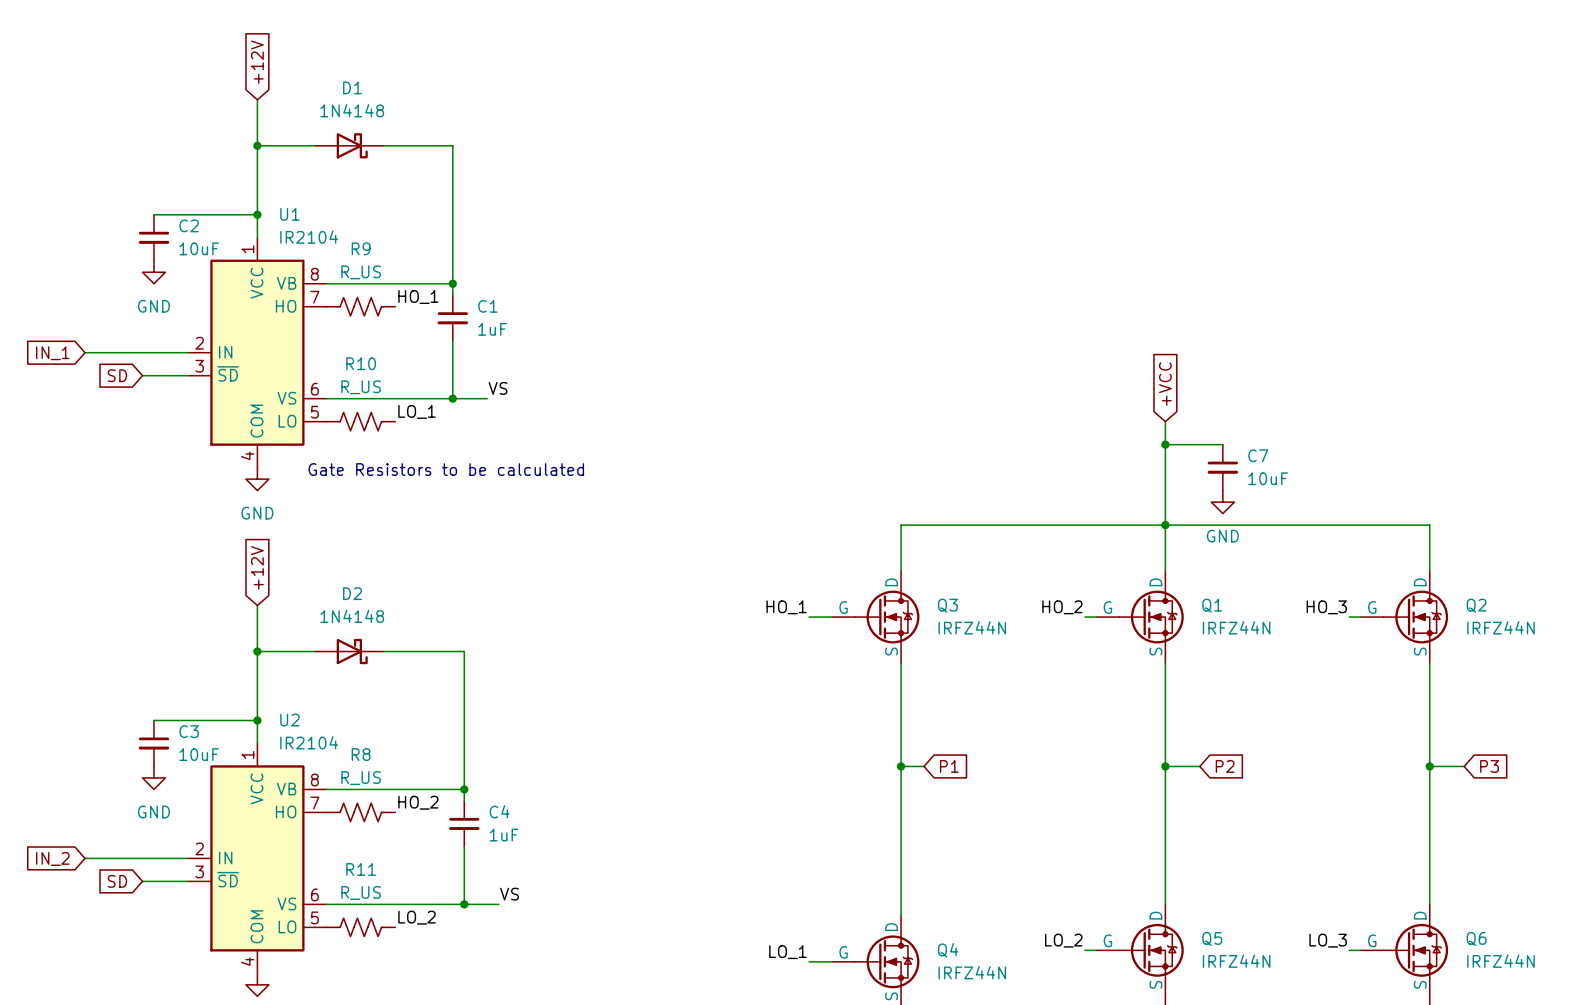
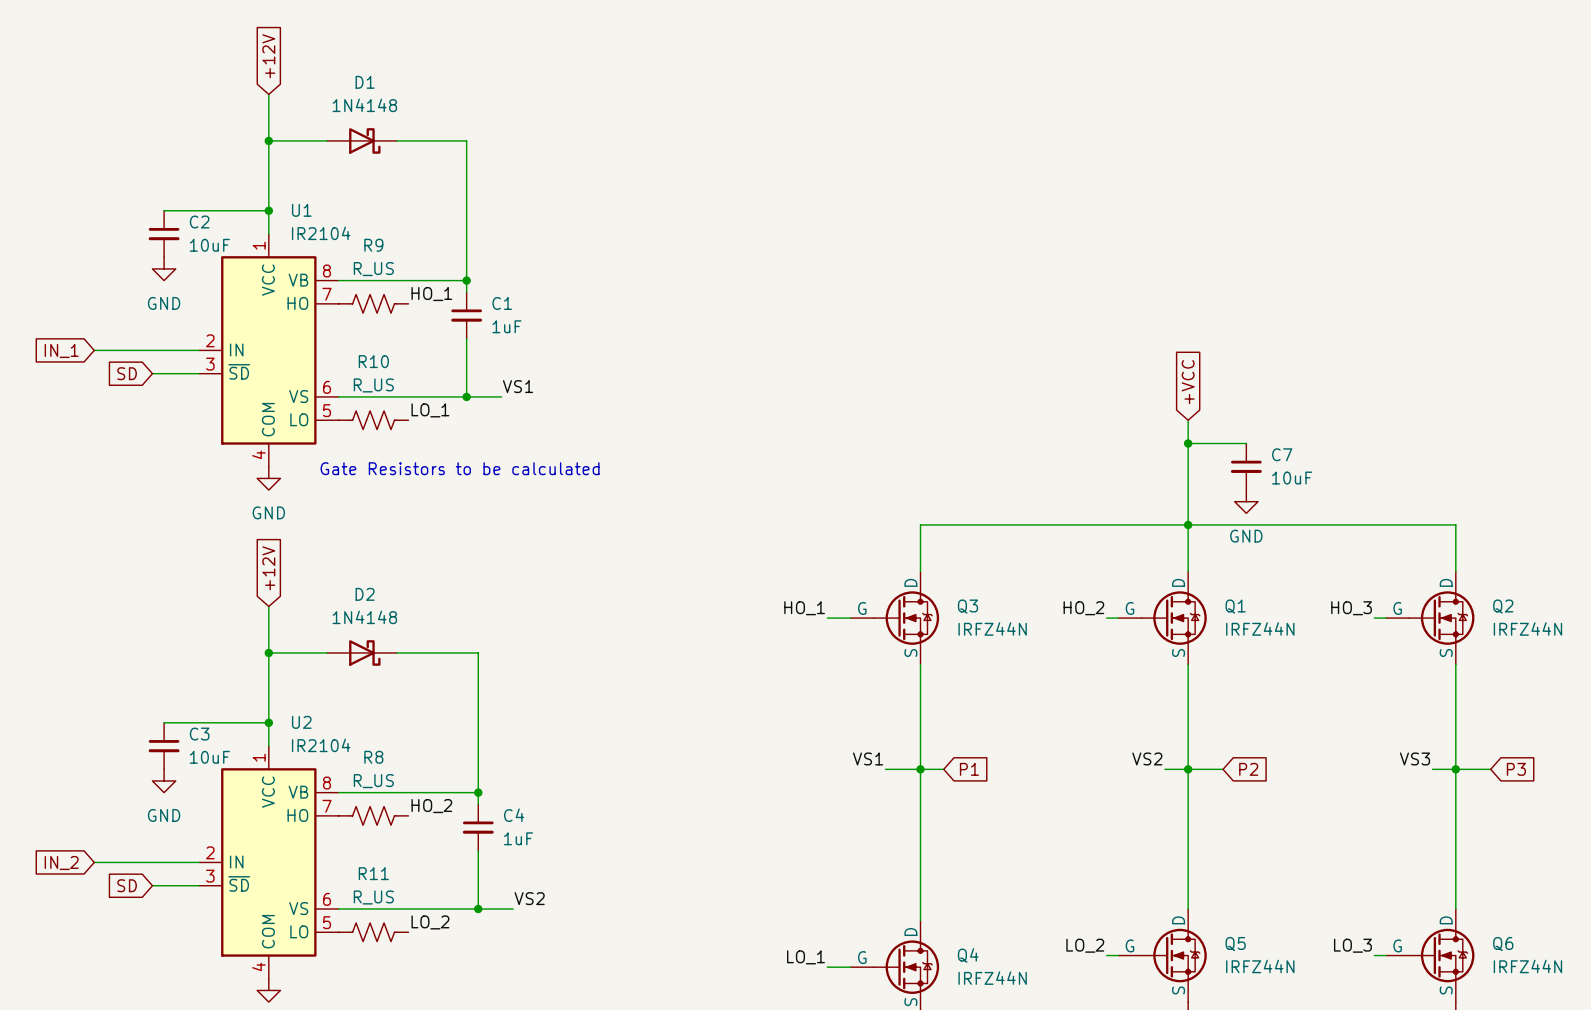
label: VS (498, 388) -> VS1 (517, 386)
label: none -> VS1 (868, 758)
label: none -> VS2 (1147, 758)
label: none -> VS3 (1414, 758)
wire: none -> (885, 769) (920, 769)
wire: none -> (1164, 769) (1188, 769)
wire: none -> (1432, 769) (1455, 769)
label: VS (509, 894) -> VS2 (529, 898)

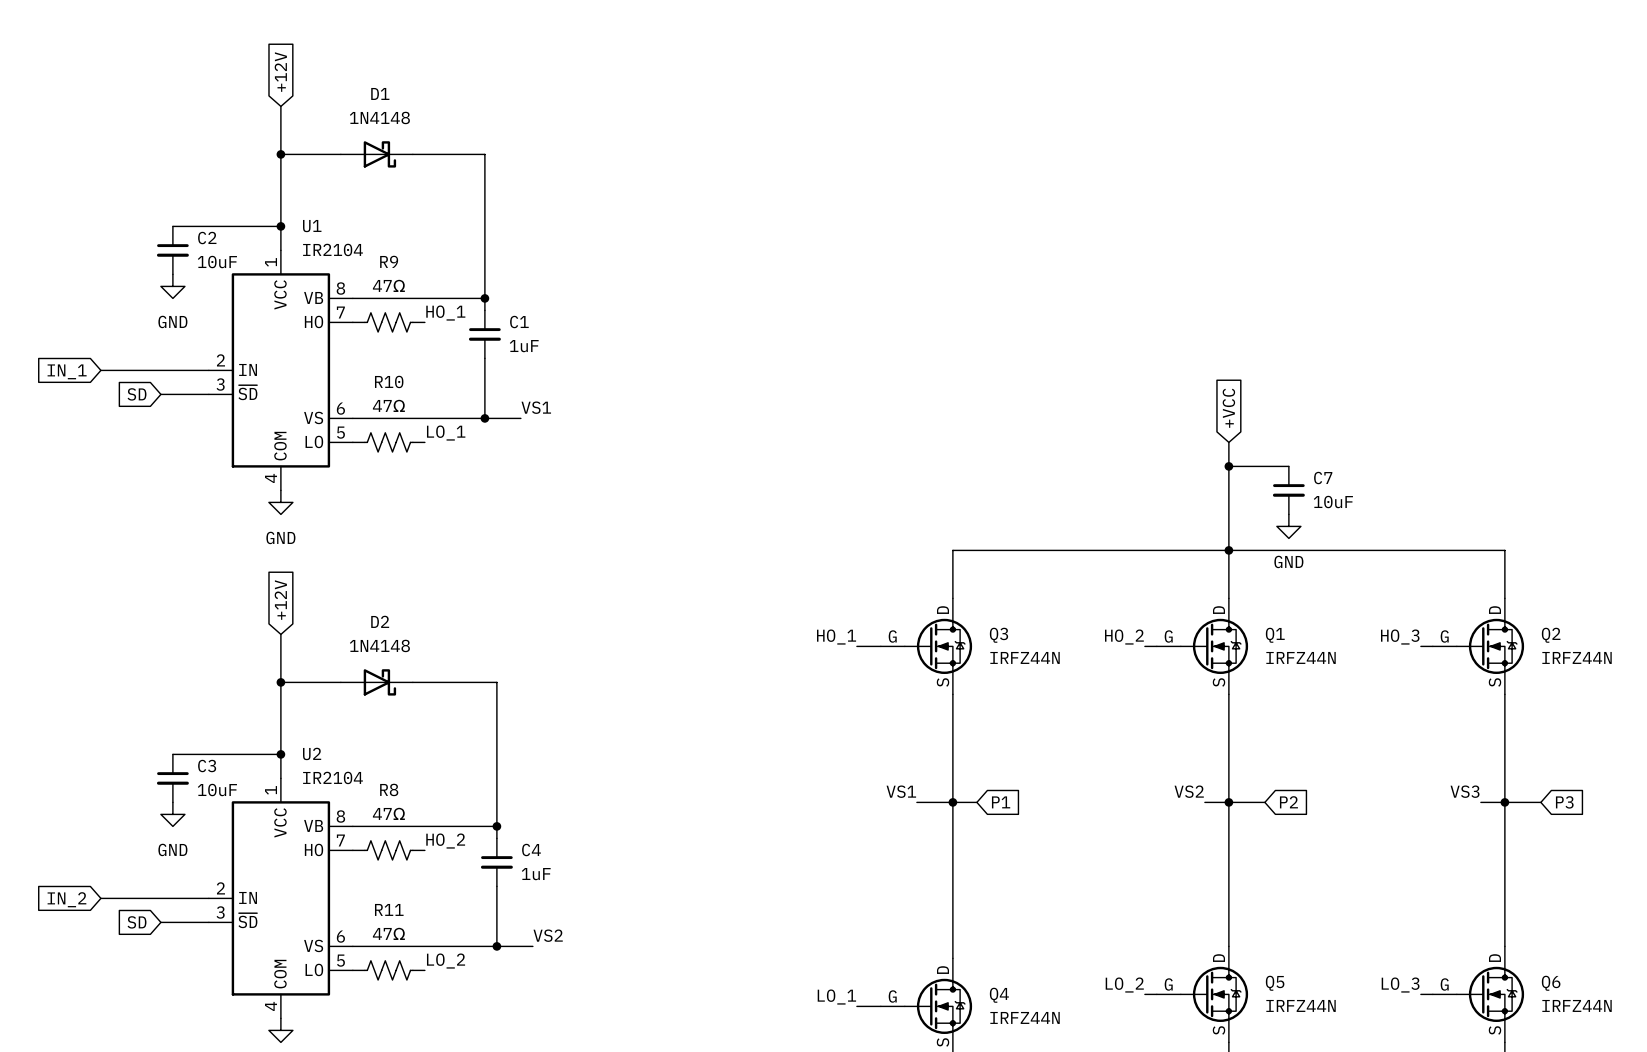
R9 value: R_US (373, 269) -> 47Ω (388, 285)
R10 value: R_US (373, 385) -> 47Ω (388, 405)
text: Gate Resistors to be calculated (460, 468) -> none
R8 value: R_US (373, 781) -> 47Ω (388, 813)
R11 value: R_US (373, 897) -> 47Ω (388, 933)

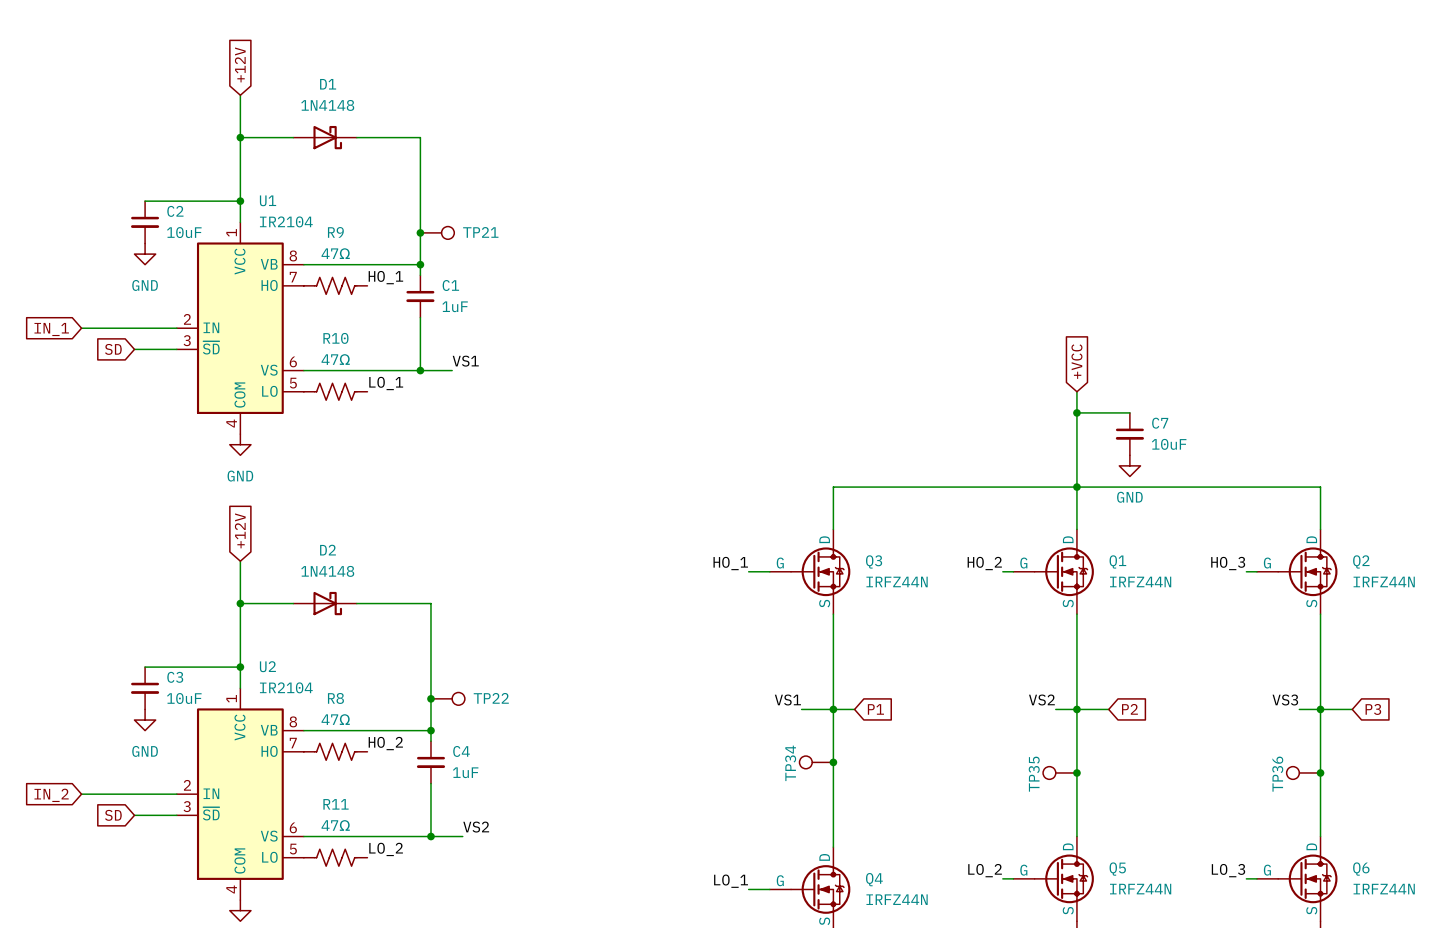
junction: none -> (420, 232)
TP21: none -> (437, 232)
junction: none -> (430, 698)
TP22: none -> (447, 698)
TP34: none -> (816, 762)
junction: none -> (833, 762)
TP35: none -> (1060, 772)
junction: none -> (1076, 772)
TP36: none -> (1303, 772)
junction: none -> (1320, 772)

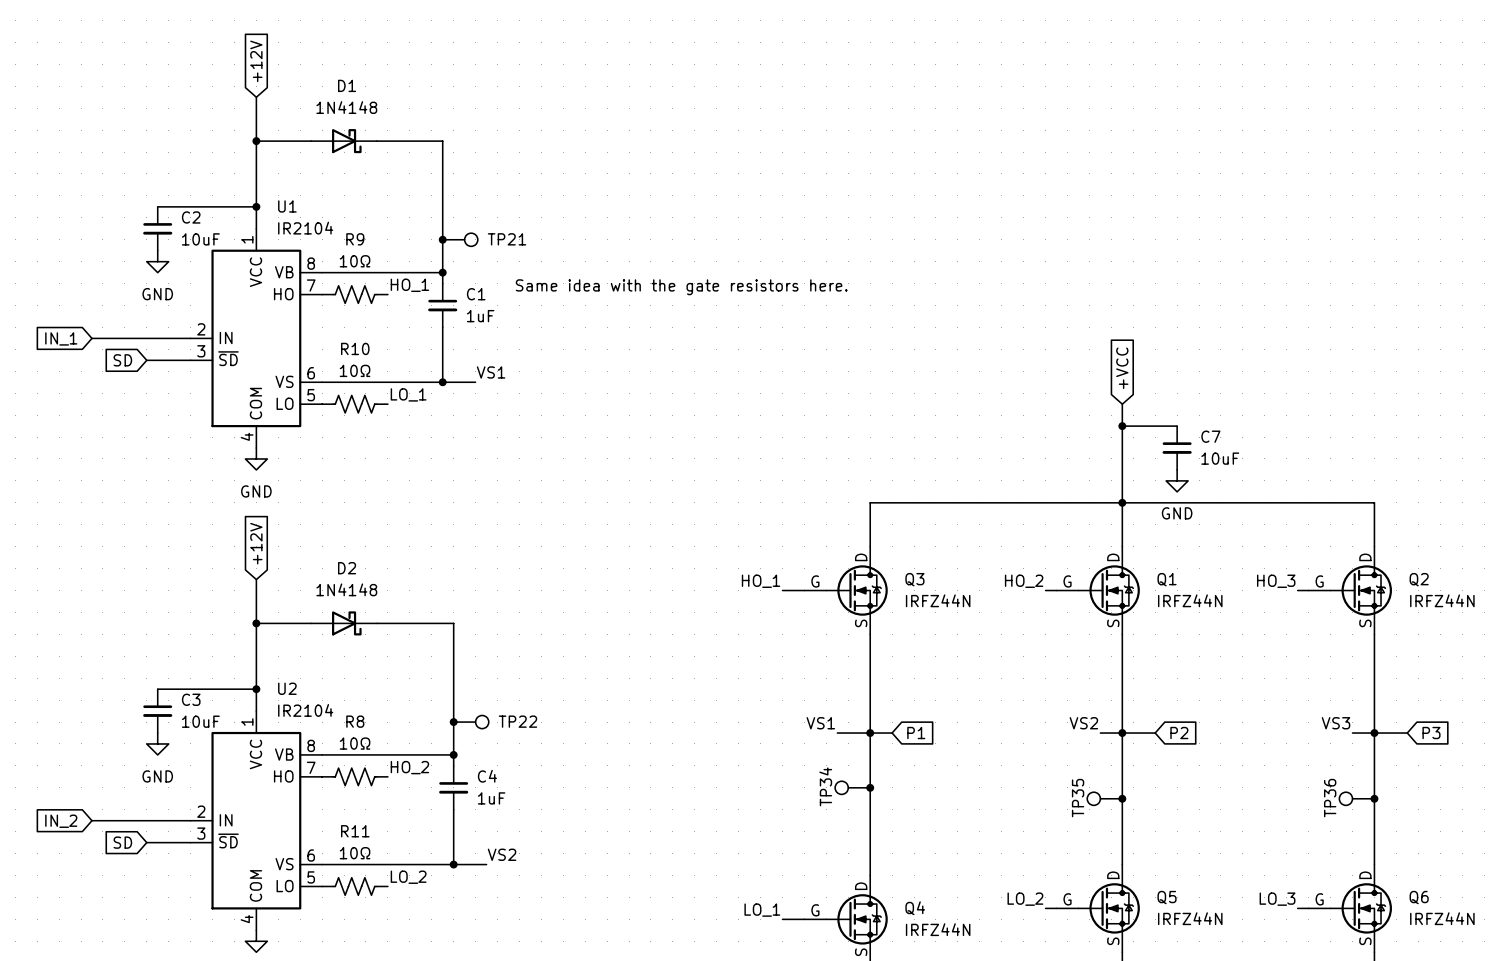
R9 value: 47Ω (335, 253) -> 10Ω (355, 261)
text: none -> Same idea with the gate resistors here. (681, 287)
R10 value: 47Ω (335, 359) -> 10Ω (355, 370)
R8 value: 47Ω (335, 719) -> 10Ω (355, 743)
R11 value: 47Ω (335, 825) -> 10Ω (355, 853)

